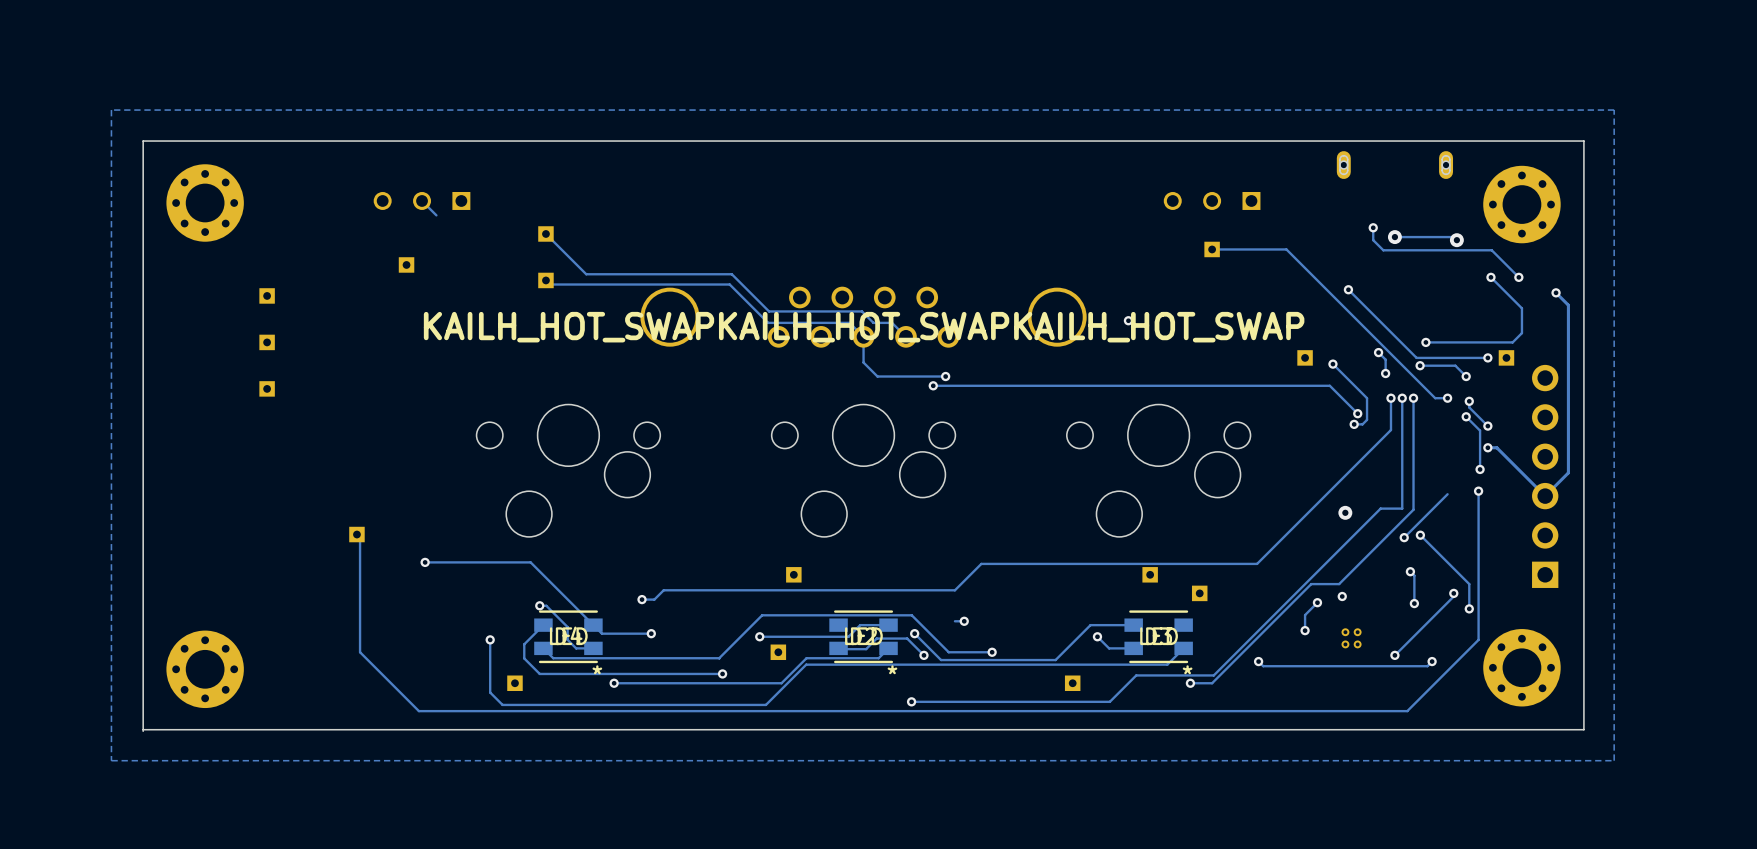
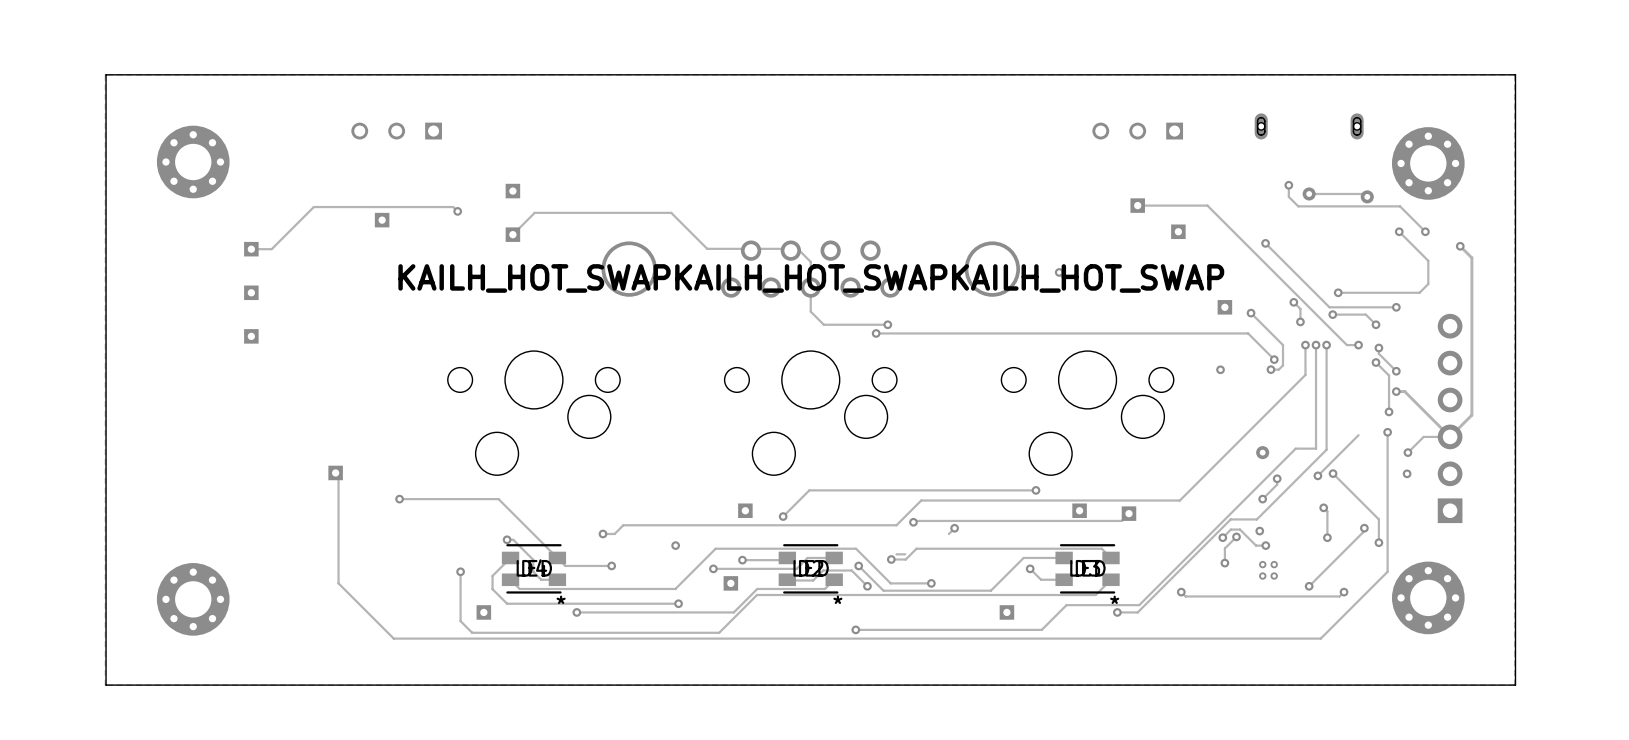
board edge: none -> (1515, 74) (106, 74) (106, 685) (1515, 685) (1515, 74)
track: (422, 200) (436, 215) -> none
part position: (422, 200) -> (396, 131)
part position: (1212, 200) -> (1137, 131)
track: (545, 233) (586, 274) (731, 274) -> (512, 234) (534, 212) (671, 212) (687, 228)
track: none -> (457, 211) (453, 207) (313, 207) (271, 249) (251, 249)
via: none -> (457, 211)
part: none -> (1178, 231)
track: (550, 284) (729, 284) (768, 322) (849, 322) (863, 336) -> none
track: (753, 295) (769, 311) (862, 311) (873, 322) (892, 322) (906, 336) -> (707, 248) (797, 248) (810, 261) (810, 287)
part: (1506, 357) -> none
via: none -> (1220, 369)
track: none -> (1450, 436) (1423, 436) (1407, 452)
via: none -> (1407, 452)
via: none -> (1407, 473)
track: none -> (1277, 478) (1277, 484) (1262, 499)
via: none -> (1277, 478)
track: none -> (1035, 490) (809, 490) (783, 516)
via: none -> (1035, 490)
via: none -> (1262, 499)
track: none -> (1128, 513) (1121, 520) (913, 522)
via: none -> (783, 516)
via: none -> (913, 522)
track: none -> (954, 528) (948, 533)
via: none -> (954, 528)
part position: (1199, 593) -> (1128, 513)
track: none -> (1222, 537) (1230, 529) (1240, 529) (1256, 545) (1265, 545)
via: none -> (1222, 537)
via: none -> (675, 545)
via: none -> (1265, 545)
via position: (964, 621) -> (891, 559)
track: none -> (787, 557) (785, 560) (742, 560)
track: none -> (1111, 557) (1101, 548) (916, 548) (905, 559) (891, 559)
via: none -> (742, 560)
board edge: (143, 729) (1583, 729) (1583, 141) (143, 141) (143, 731) -> none

